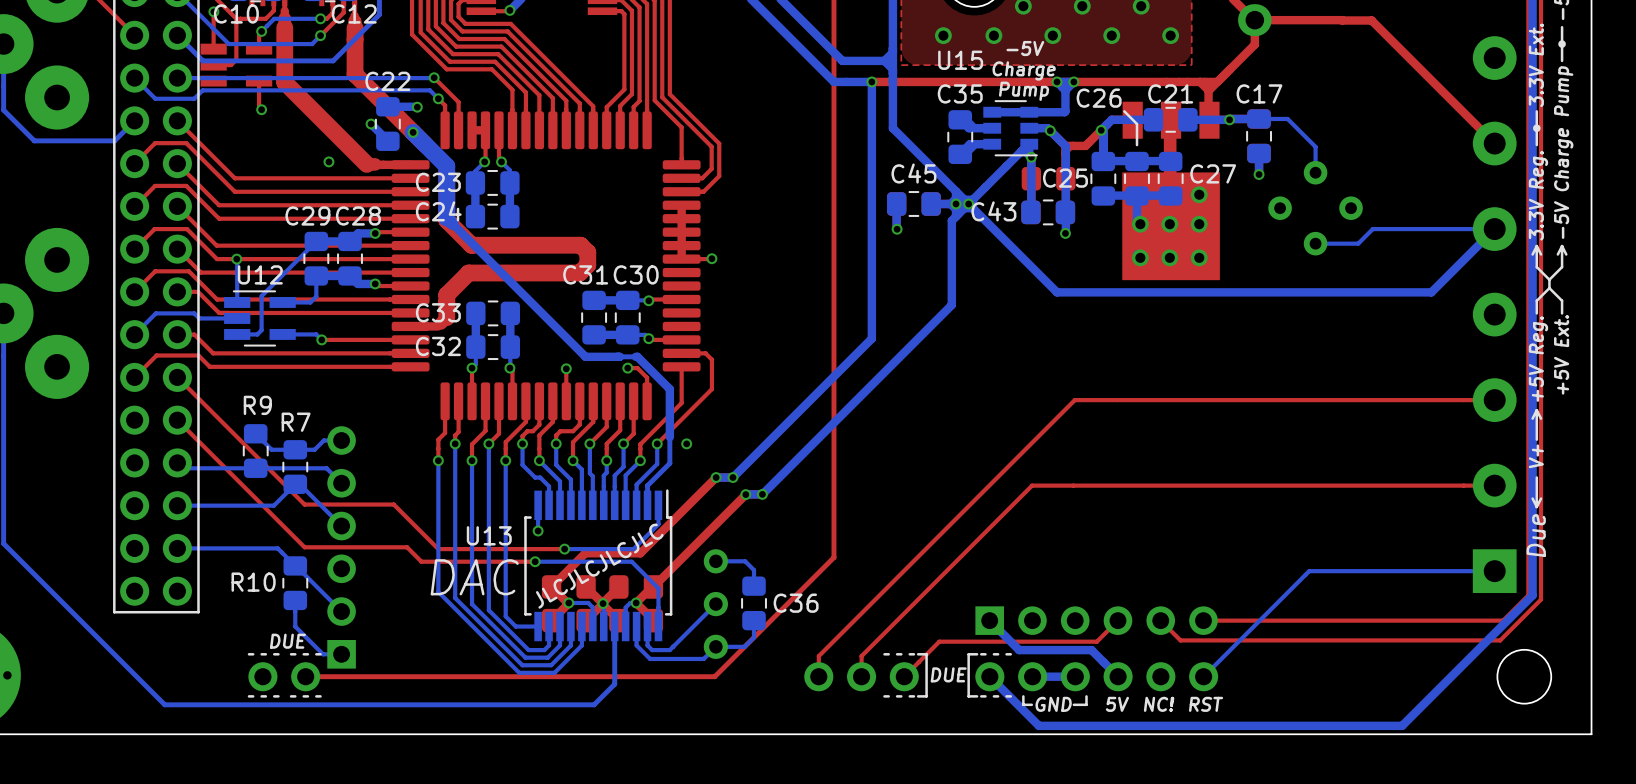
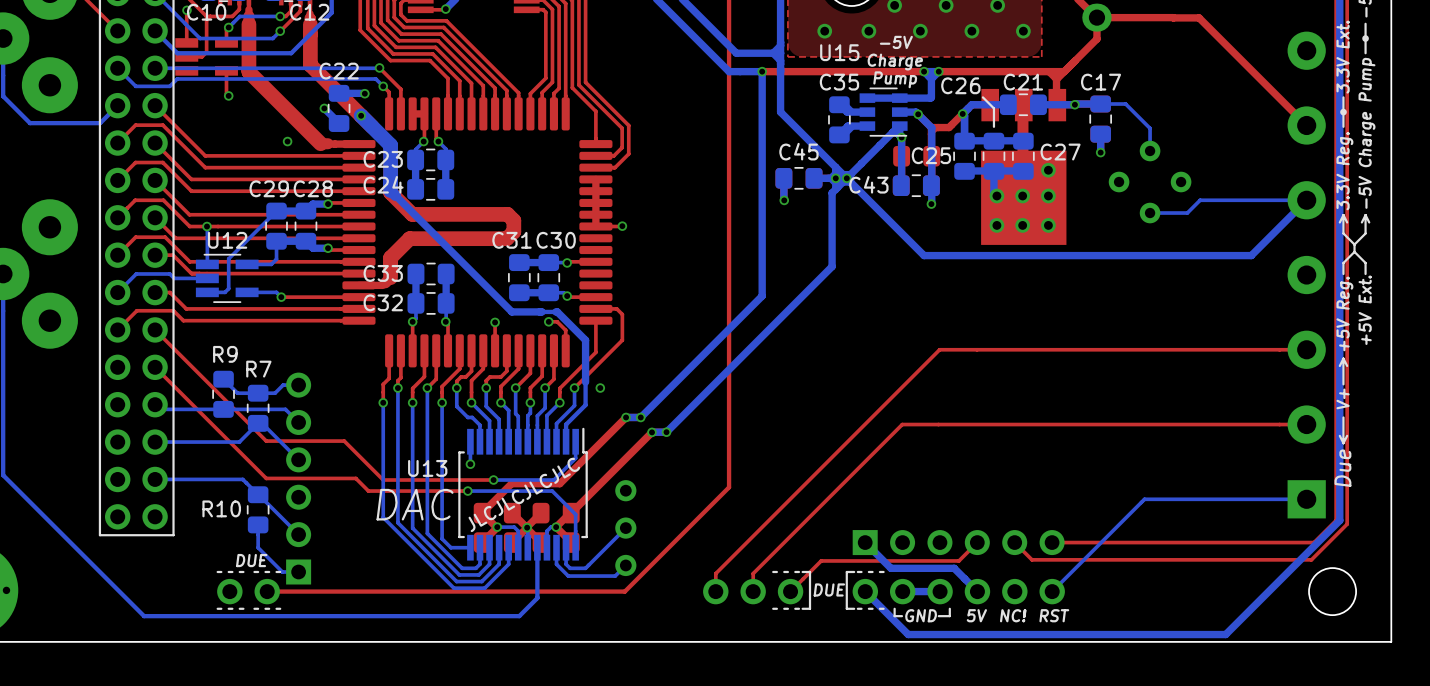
bottom track: (715, 561) (745, 561) (754, 570) (754, 586) -> none
C36: (754, 603) -> none
bottom track: (754, 620) (754, 637) (744, 646) (715, 646) -> none

